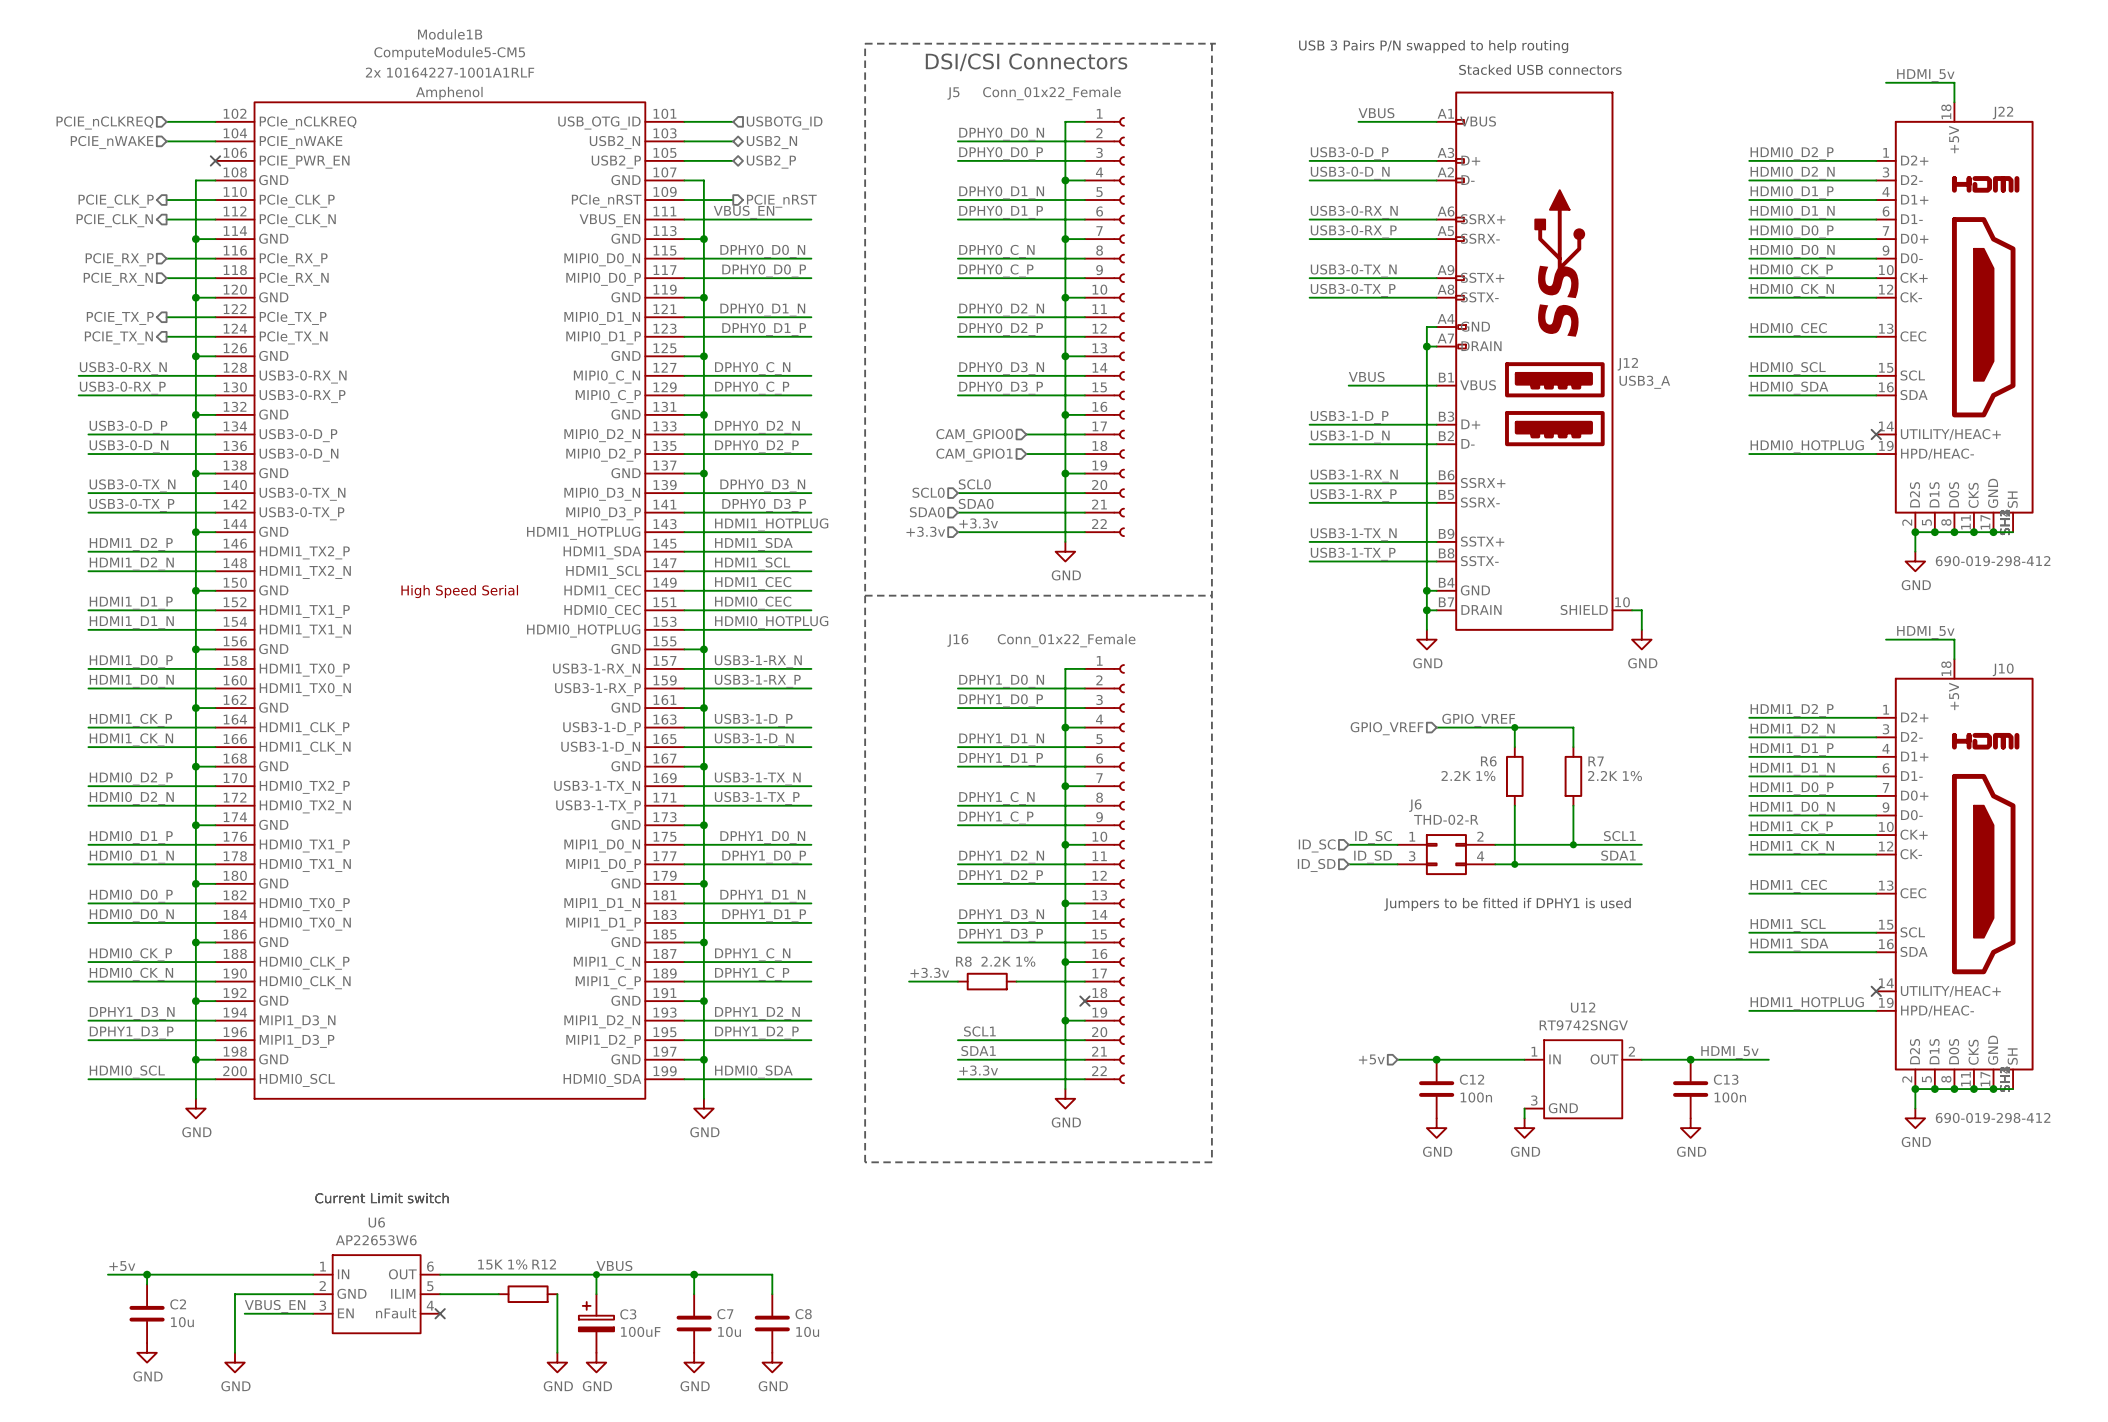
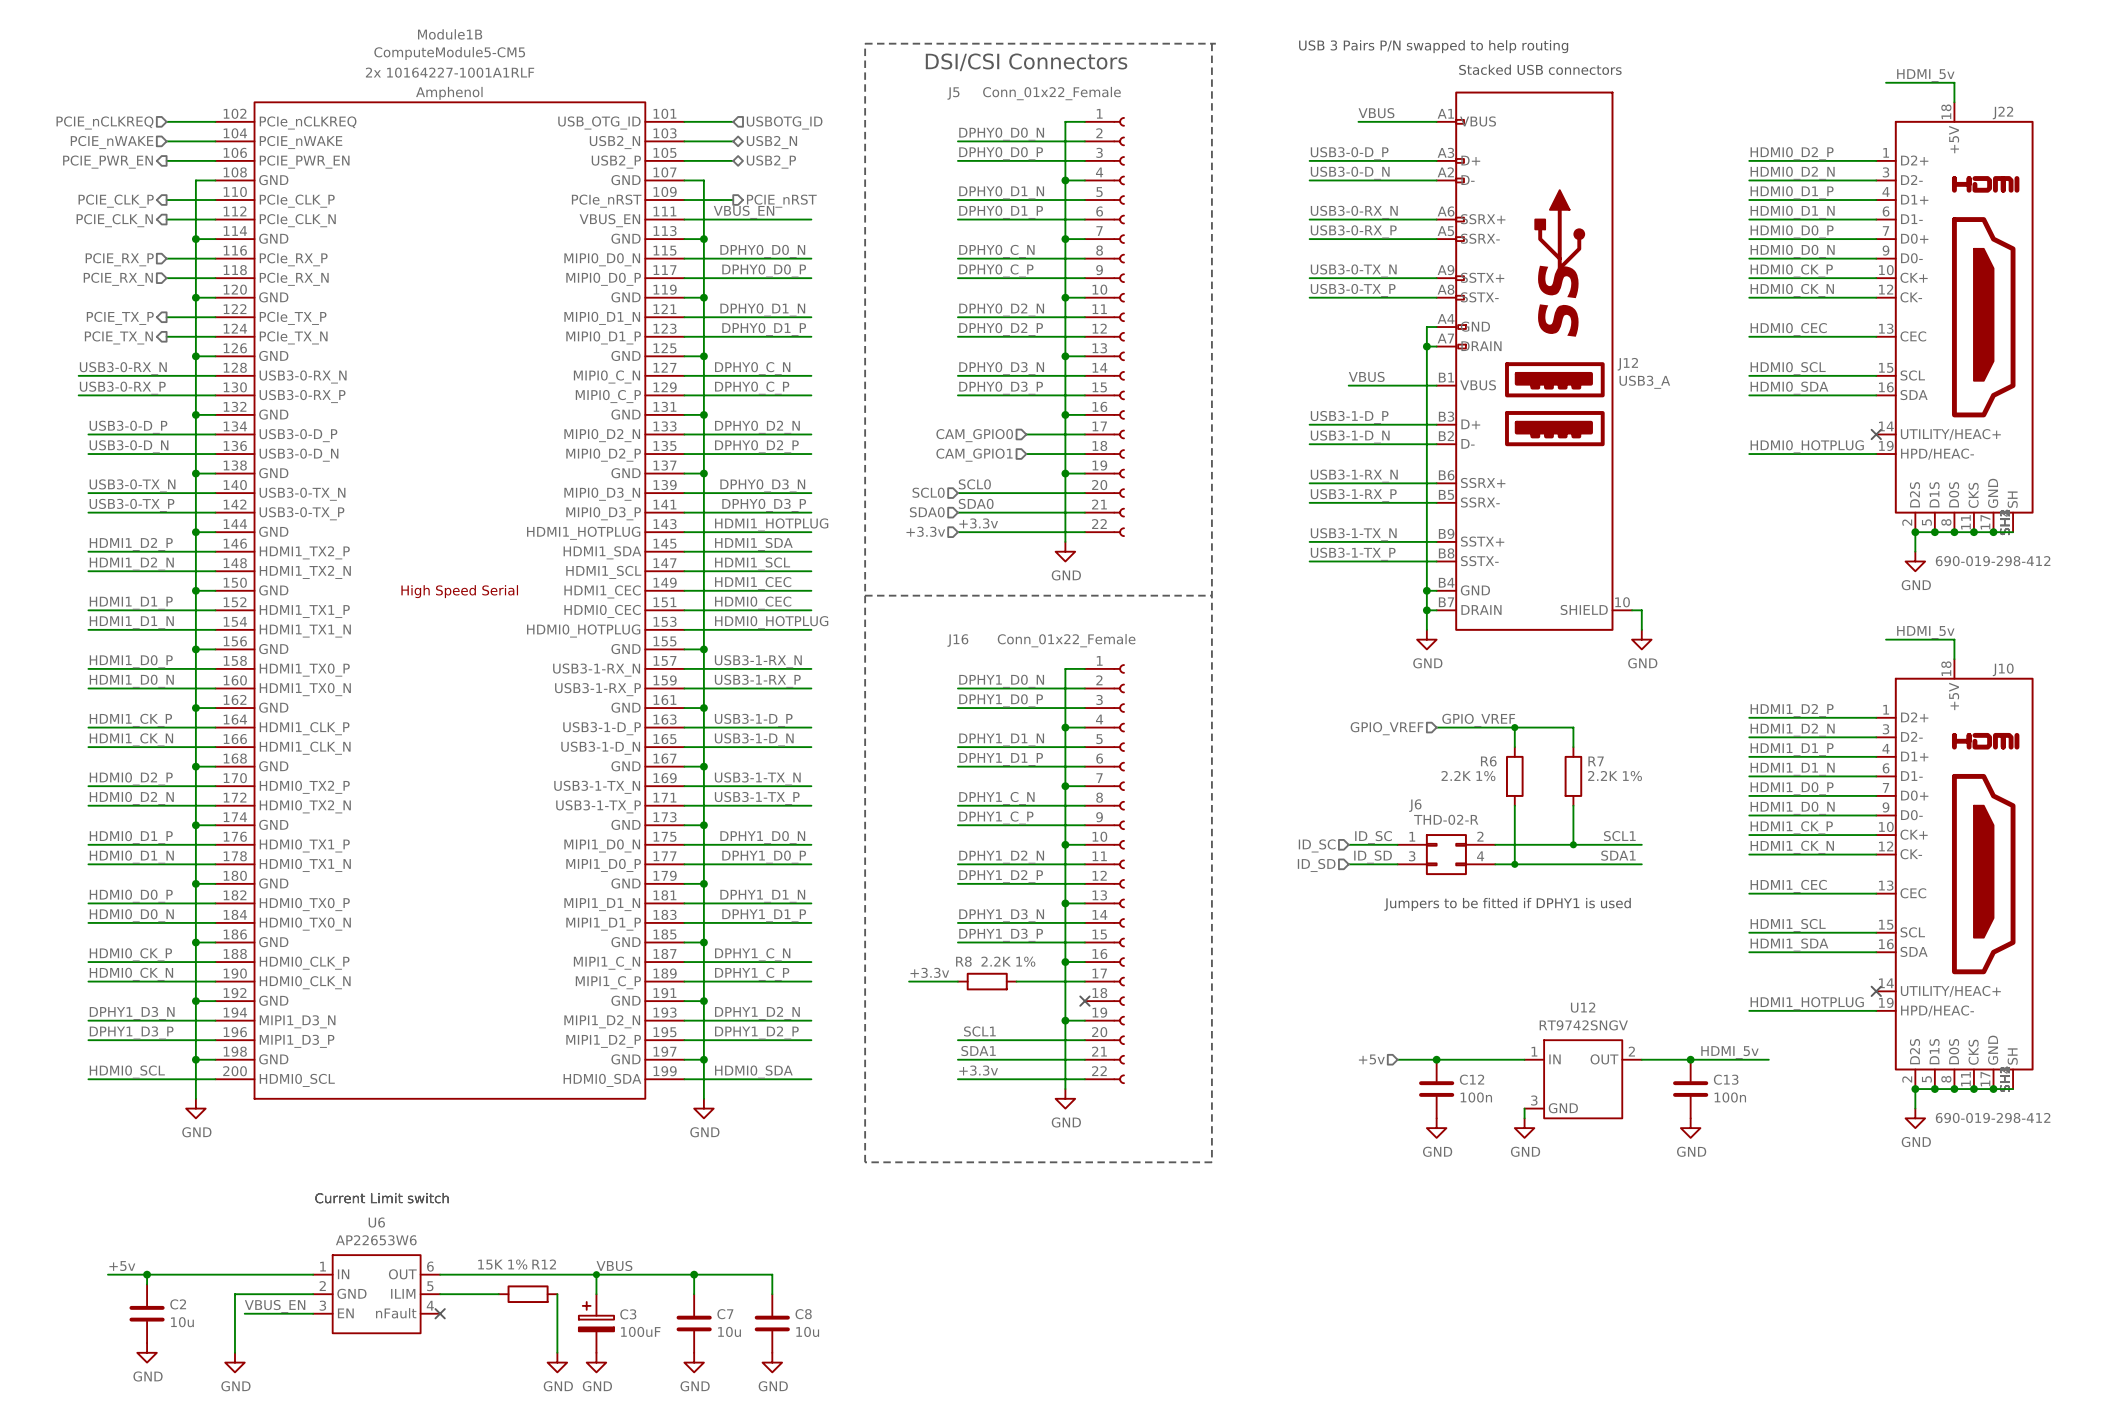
wire: none -> (166, 160) (215, 160)
no-connect mark: (215, 160) -> none
hierarchical label: none -> PCIE_PWR_EN (107, 162)

